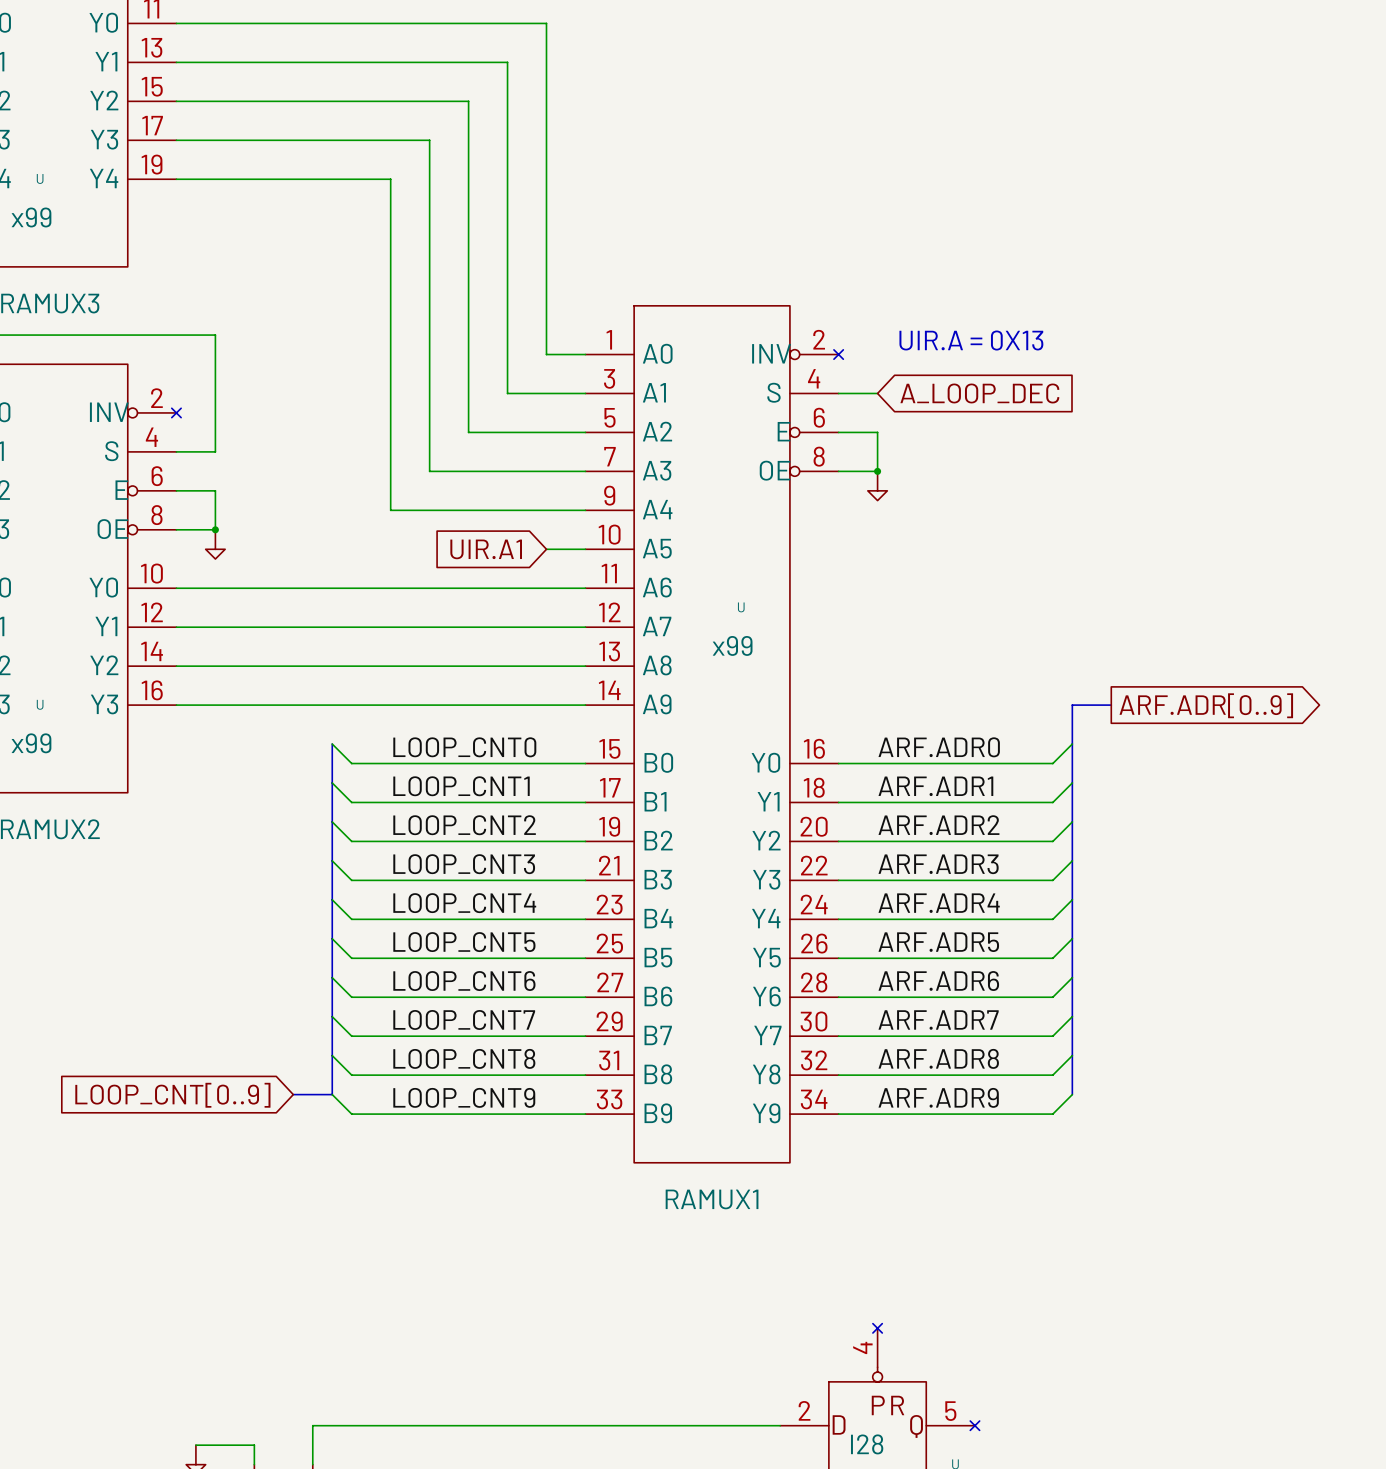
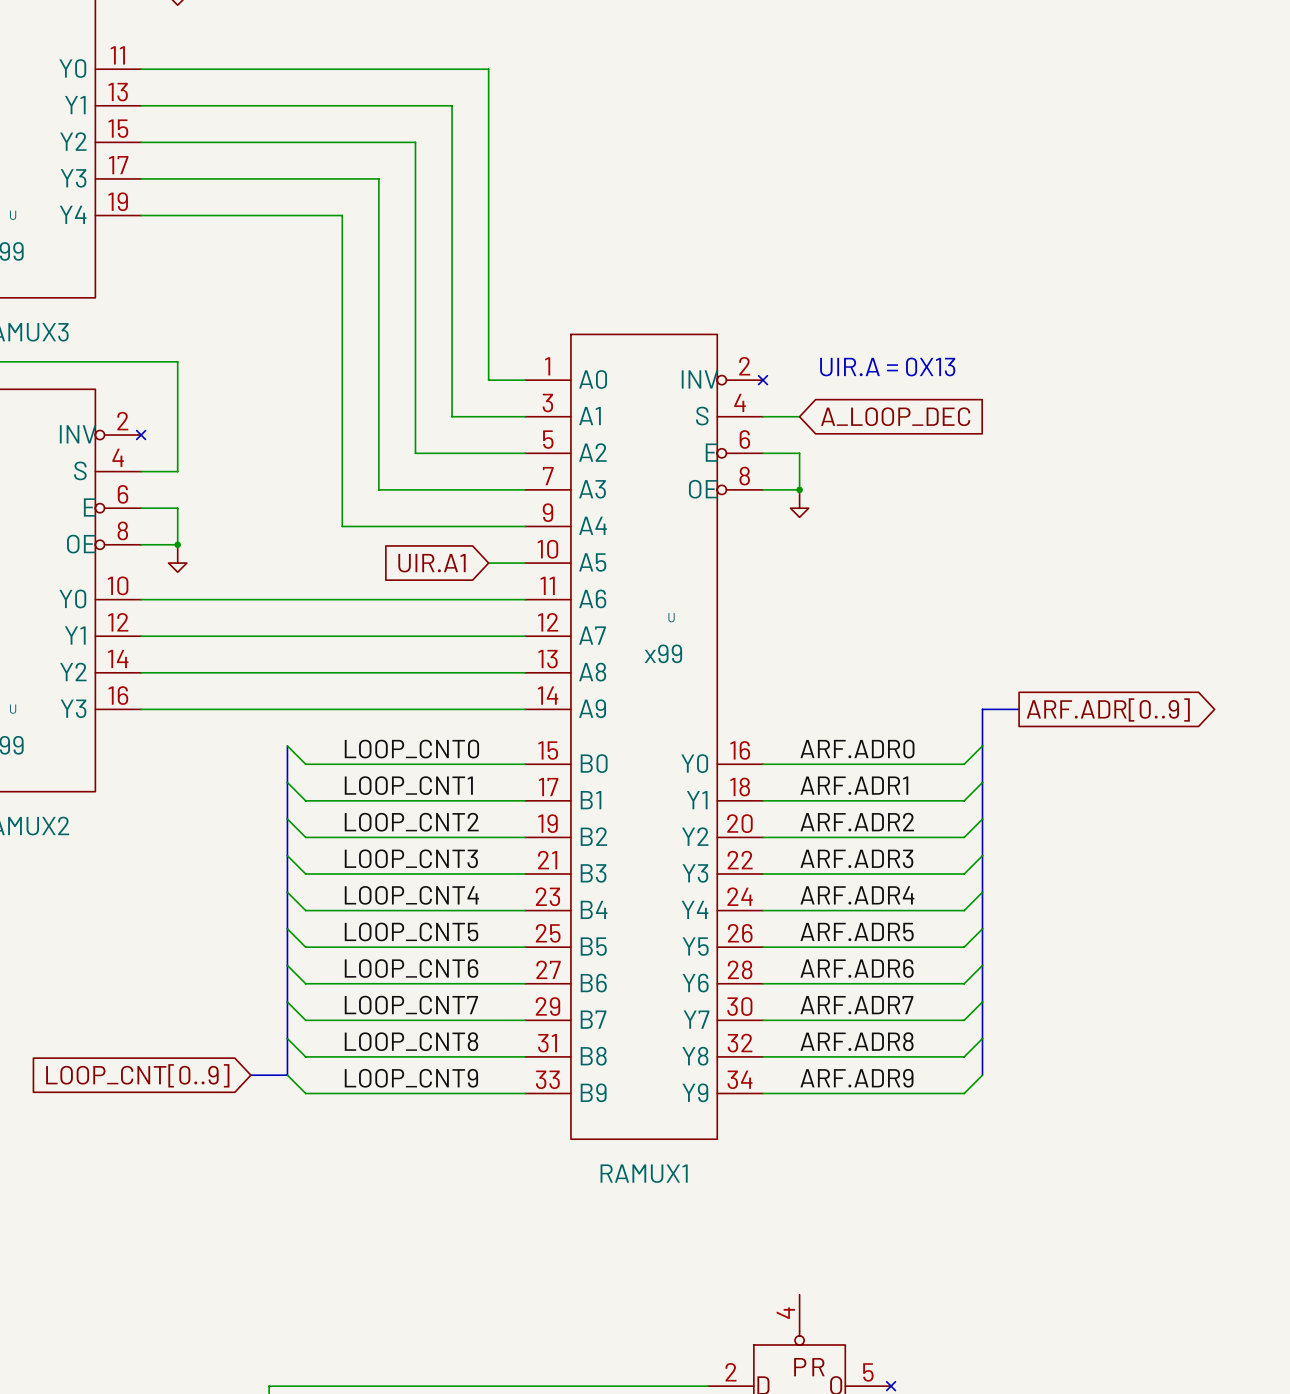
no-connect mark: (877, 1328) -> none

